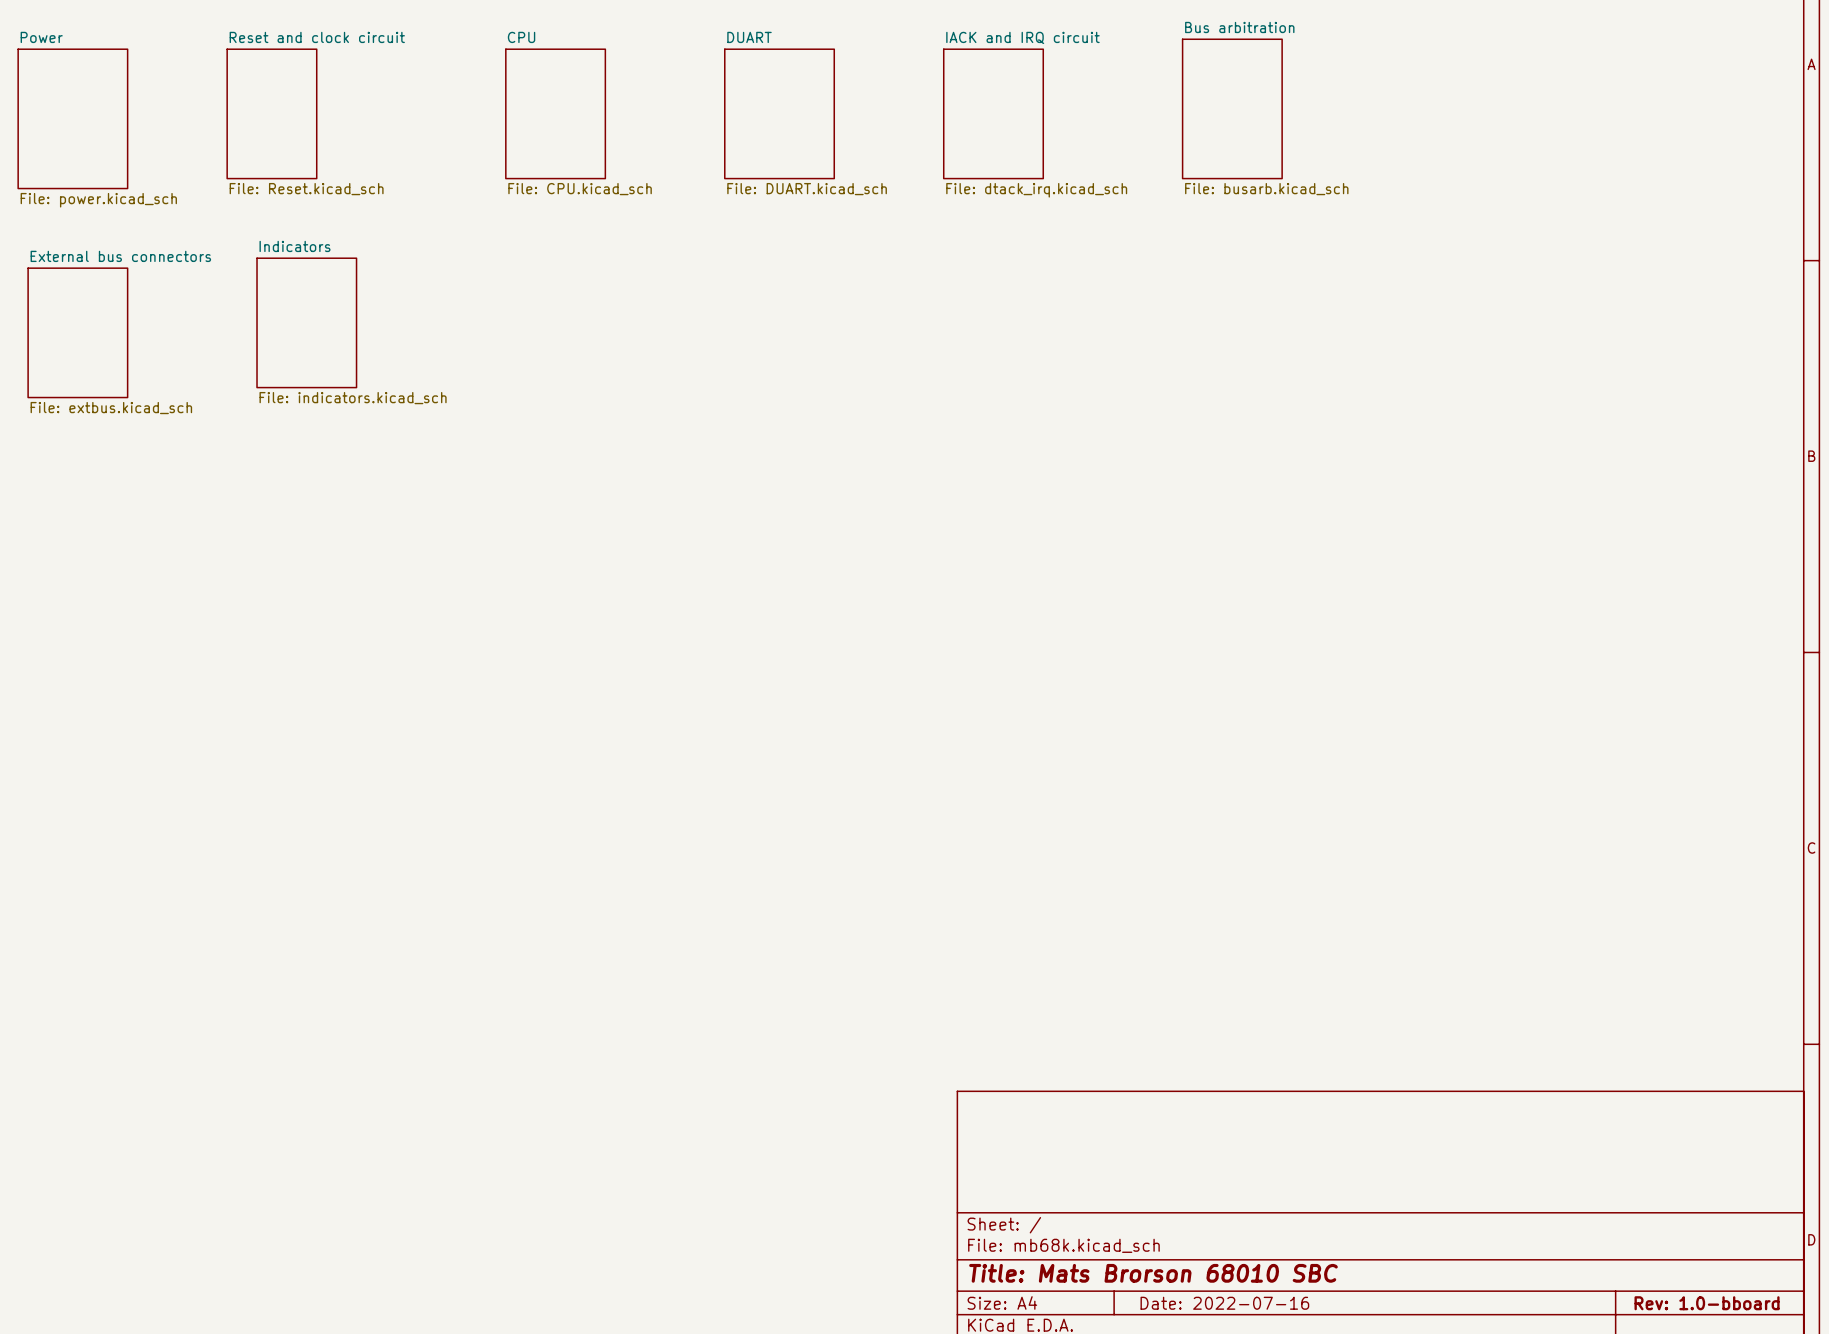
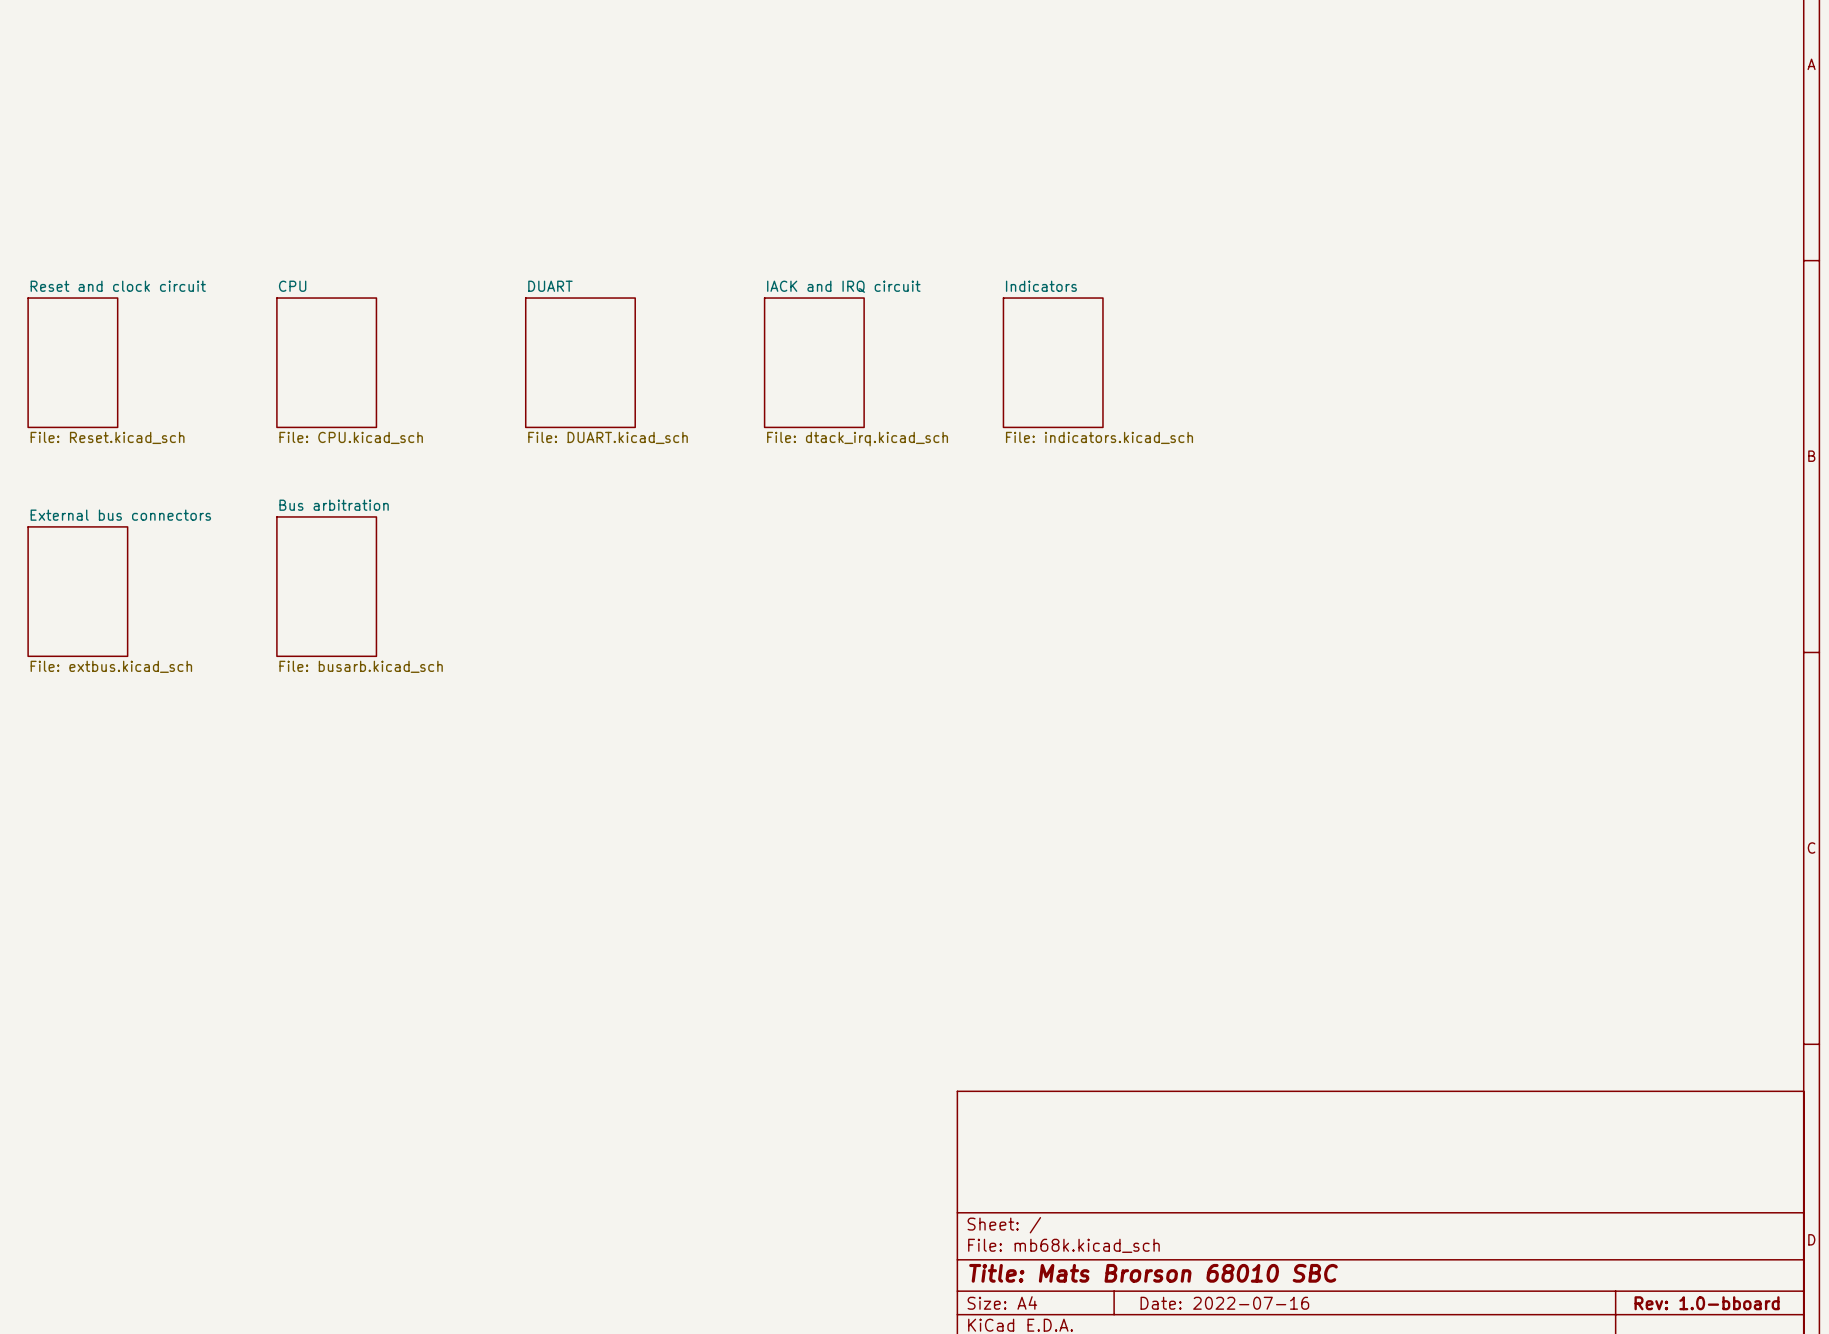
sheet Bus arbitration: File: busarb.kicad_sch (1232, 108) -> none
sheet Reset and clock circuit: File: Reset.kicad_sch (271, 113) -> none
sheet CPU: File: CPU.kicad_sch (555, 113) -> none
sheet DUART: File: DUART.kicad_sch (779, 113) -> none
sheet IACK and IRQ circuit: File: dtack_irq.kicad_sch (993, 113) -> none
sheet Power: File: power.kicad_sch (72, 118) -> none
sheet Indicators: File: indicators.kicad_sch (306, 322) -> none
sheet External bus connectors: File: extbus.kicad_sch (77, 332) -> none
sheet Reset and clock circuit: none -> File: Reset.kicad_sch (72, 362)
sheet CPU: none -> File: CPU.kicad_sch (326, 362)
sheet DUART: none -> File: DUART.kicad_sch (580, 362)
sheet IACK and IRQ circuit: none -> File: dtack_irq.kicad_sch (814, 362)
sheet Indicators: none -> File: indicators.kicad_sch (1053, 362)
sheet Bus arbitration: none -> File: busarb.kicad_sch (326, 586)
sheet External bus connectors: none -> File: extbus.kicad_sch (77, 591)

